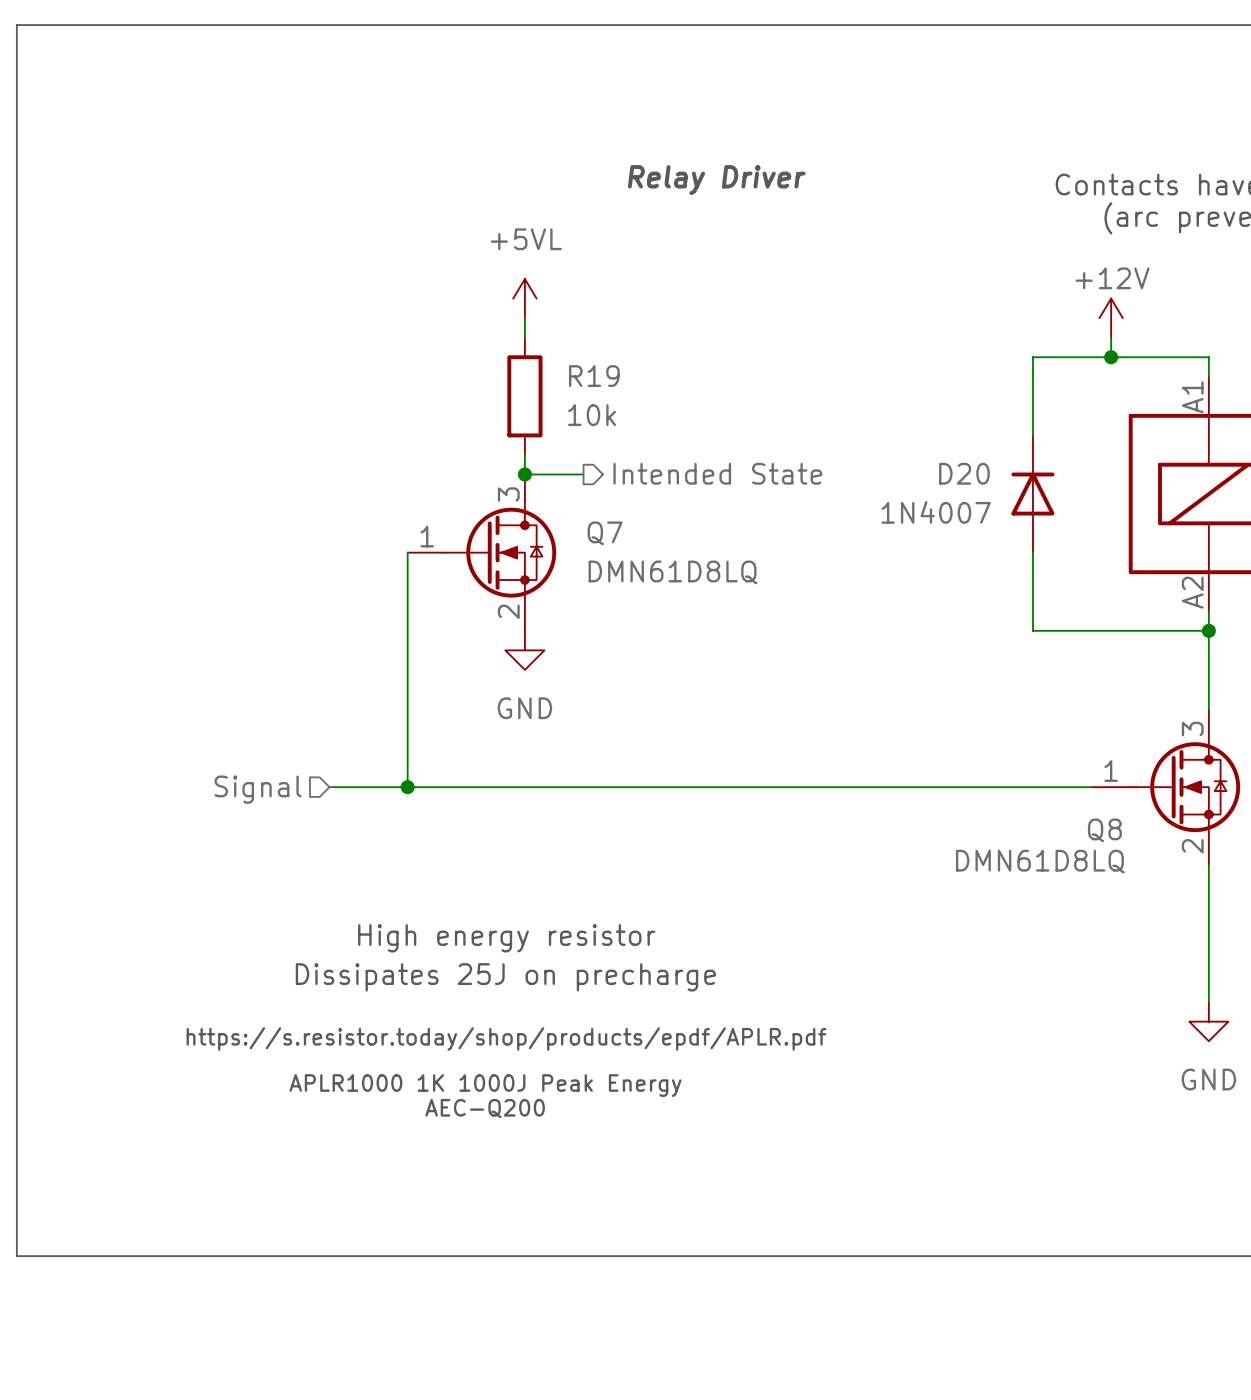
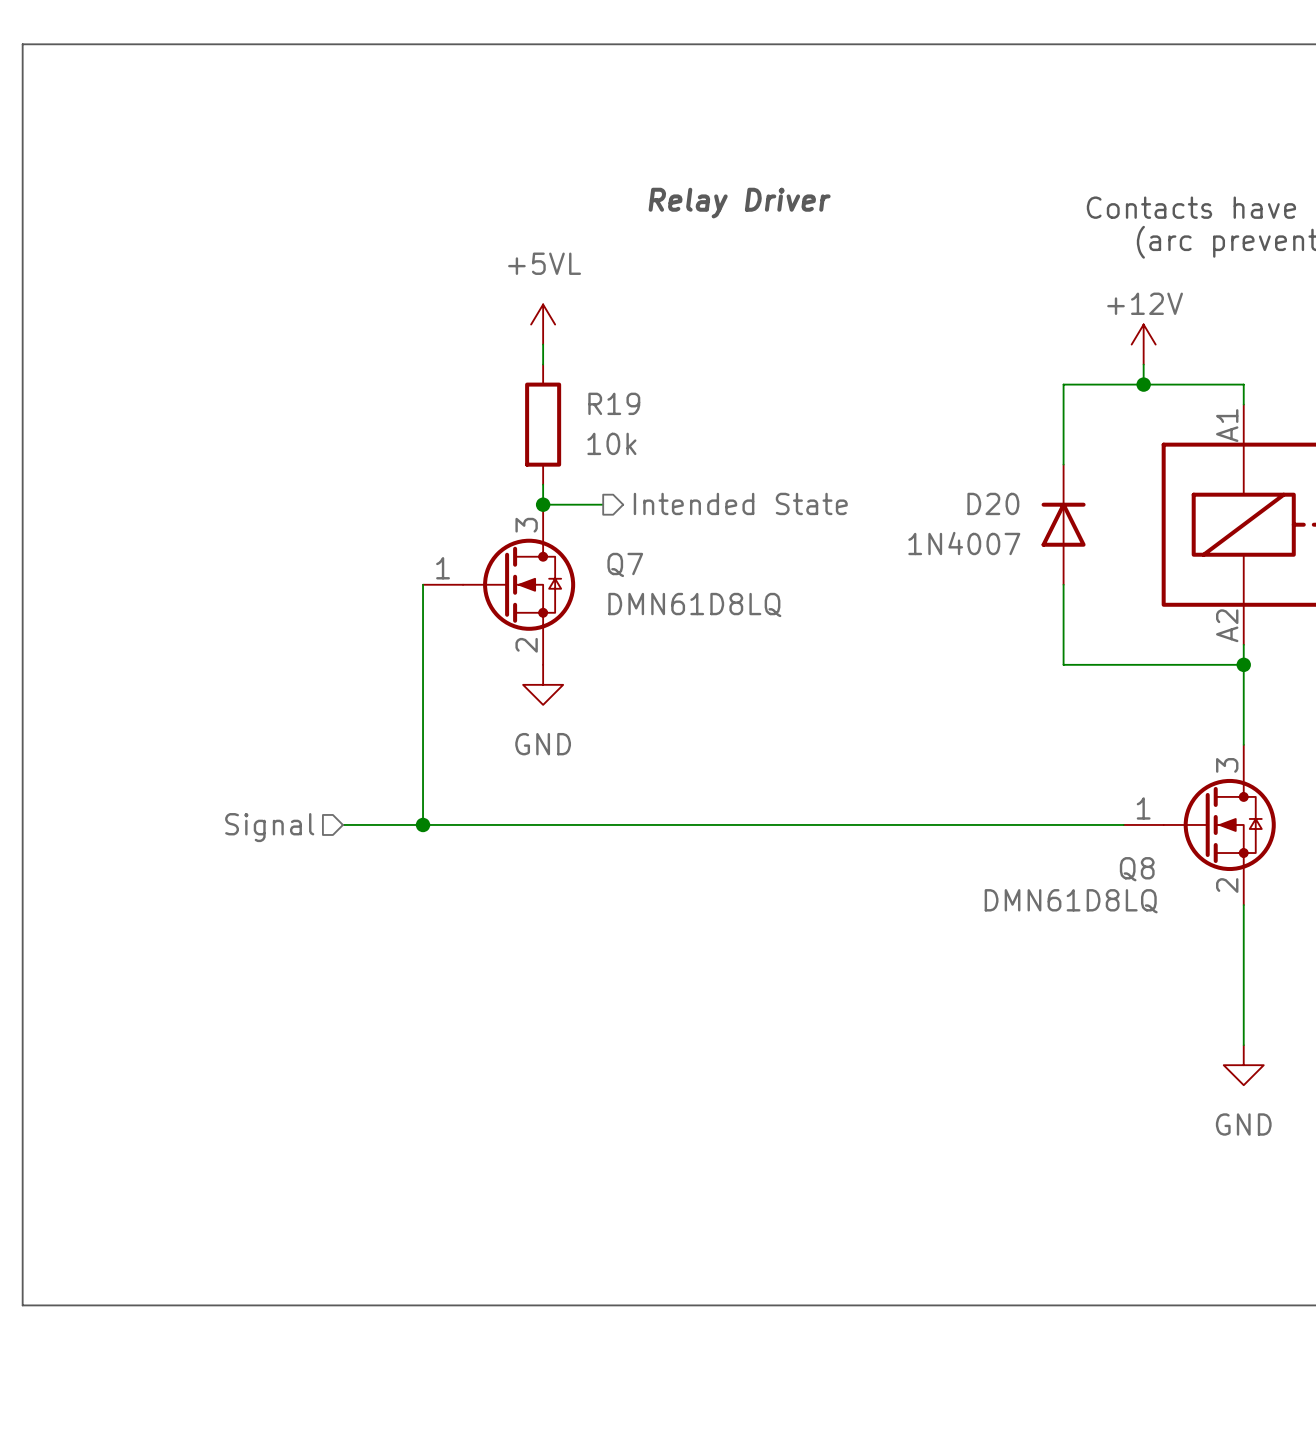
text: High energy resistor (506, 938) -> none
text: Dissipates 25J on precharge (505, 977) -> none
text: https://s.resistor.today/shop/products/epdf/APLR.pdf (506, 1038) -> none
text: APLR1000 1K 1000J Peak Energy (485, 1085) -> none
text: AEC-Q200 (485, 1108) -> none

